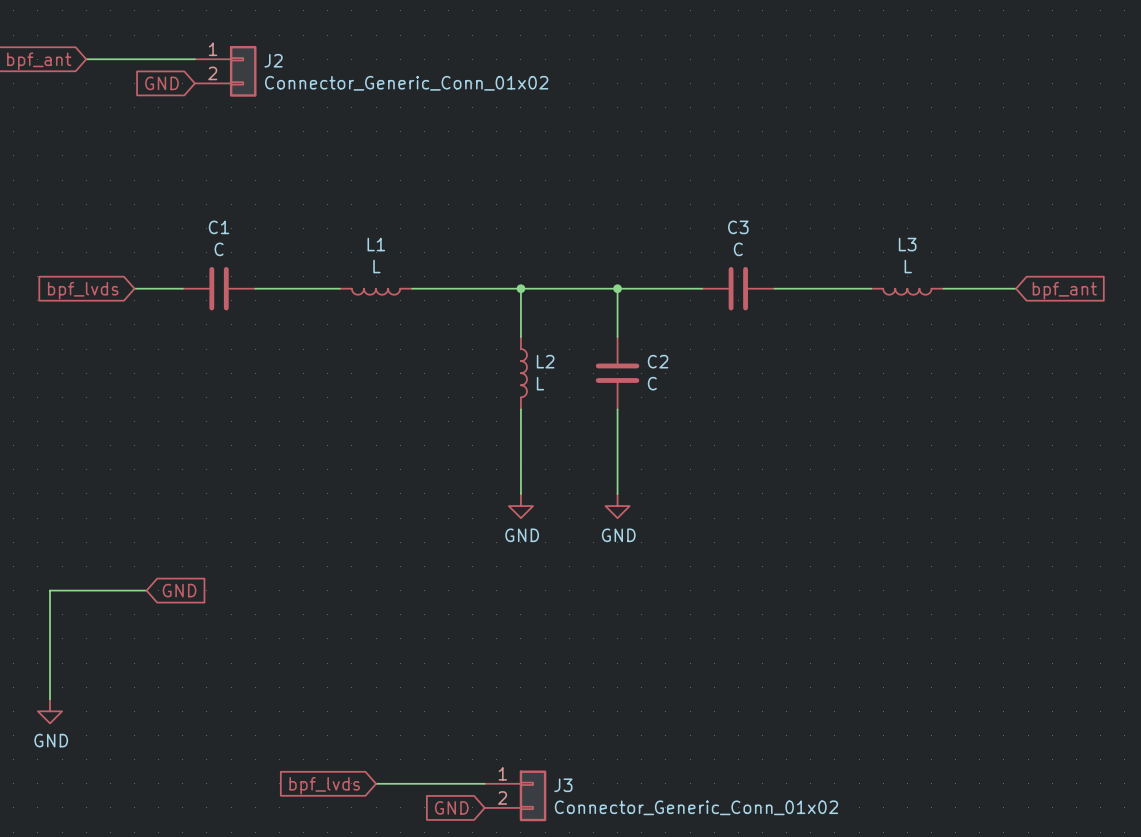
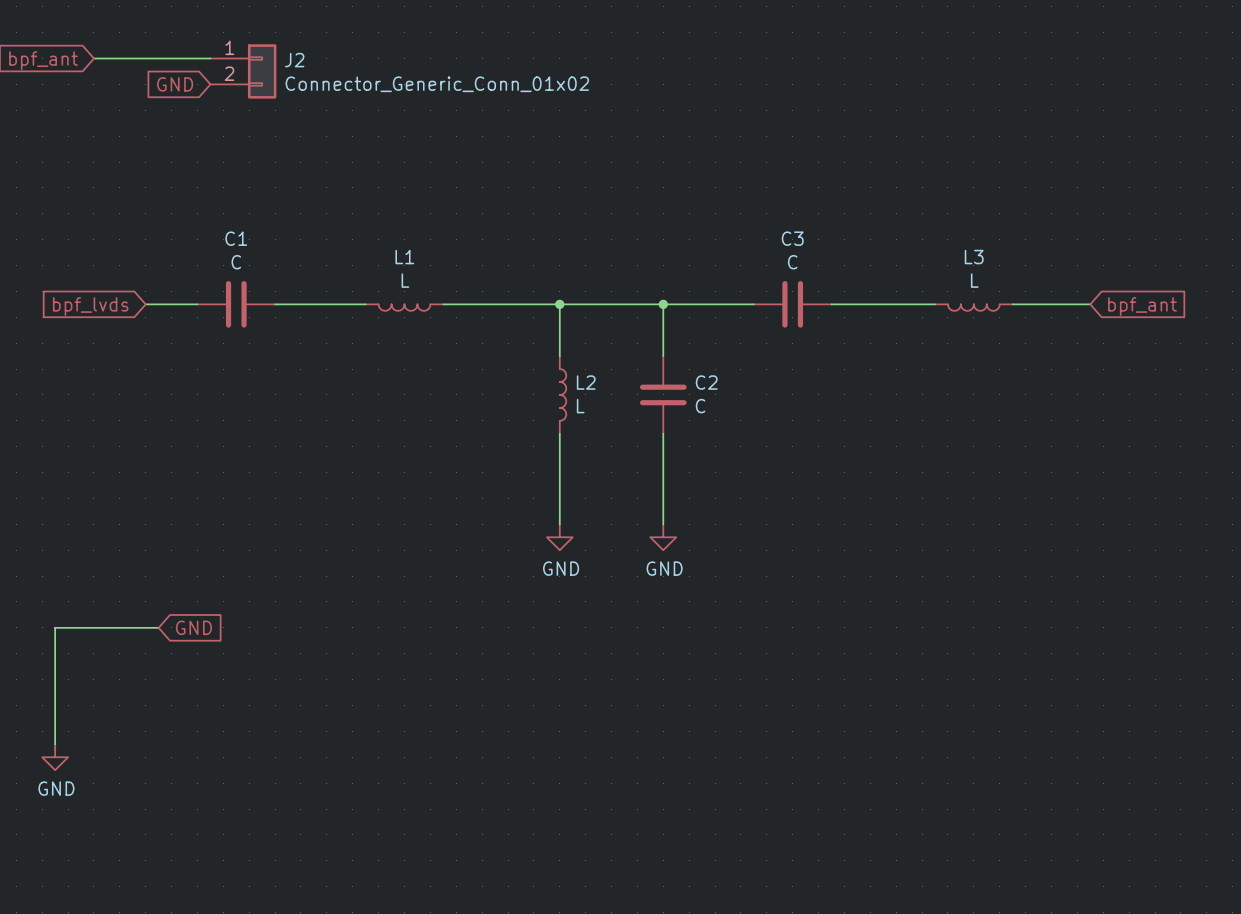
wire: (376, 783) (484, 783) -> none
global label: bpf_lvds (324, 785) -> none
J3: Connector_Generic_Conn_01x02 (515, 795) -> none
global label: GND (451, 807) -> none

